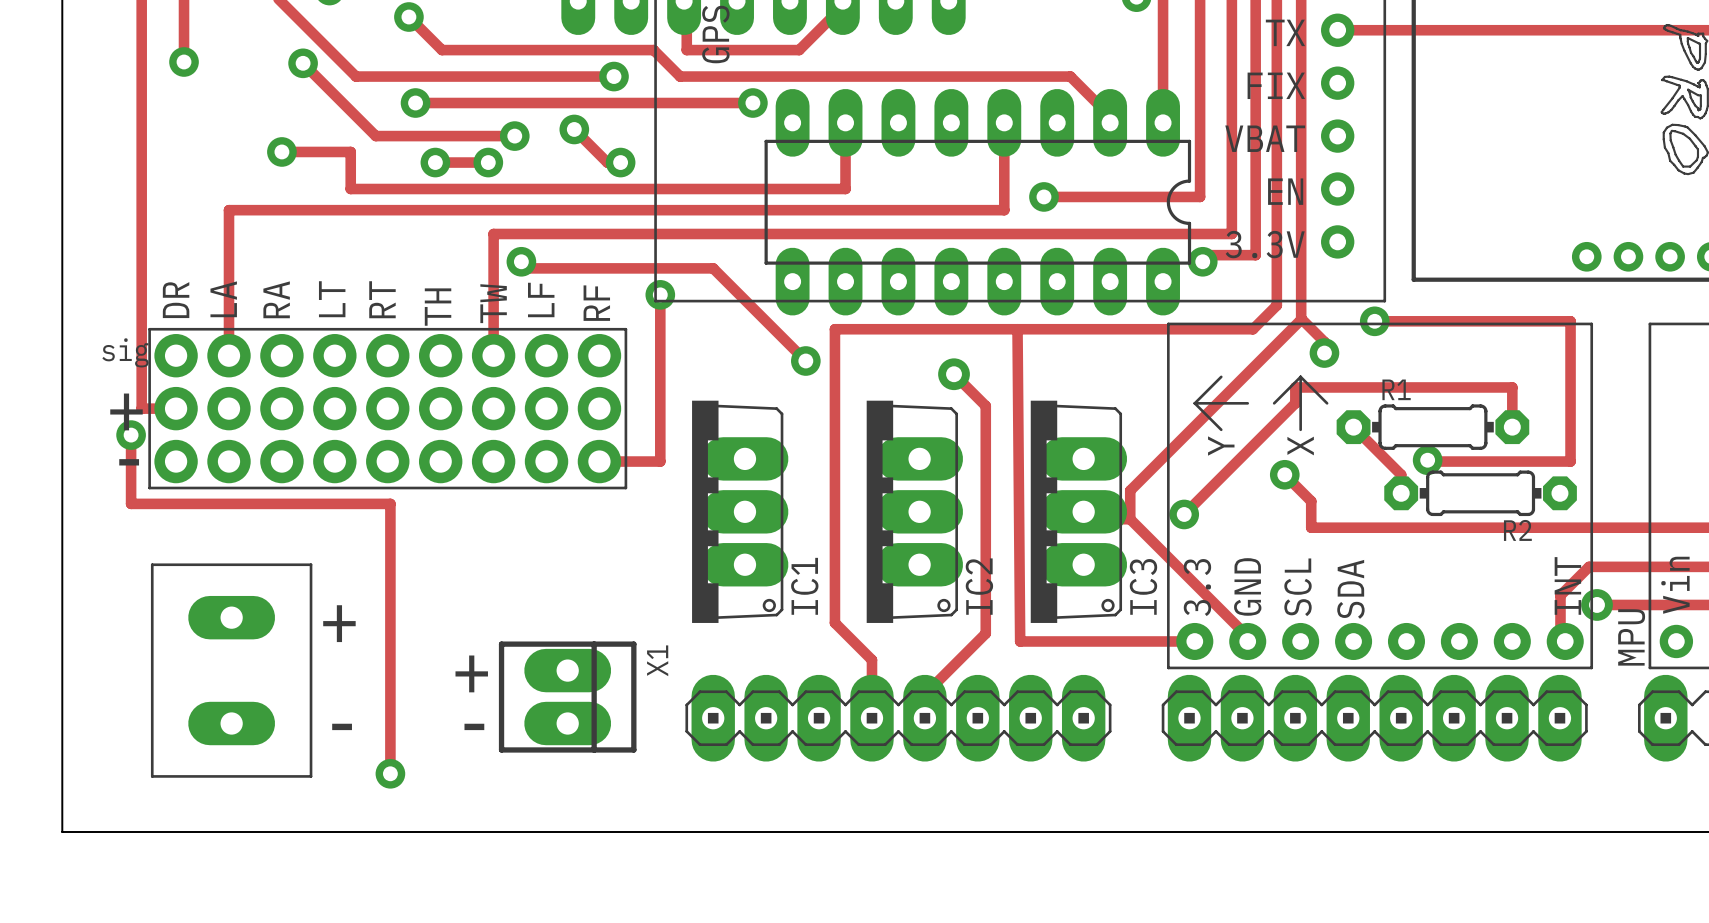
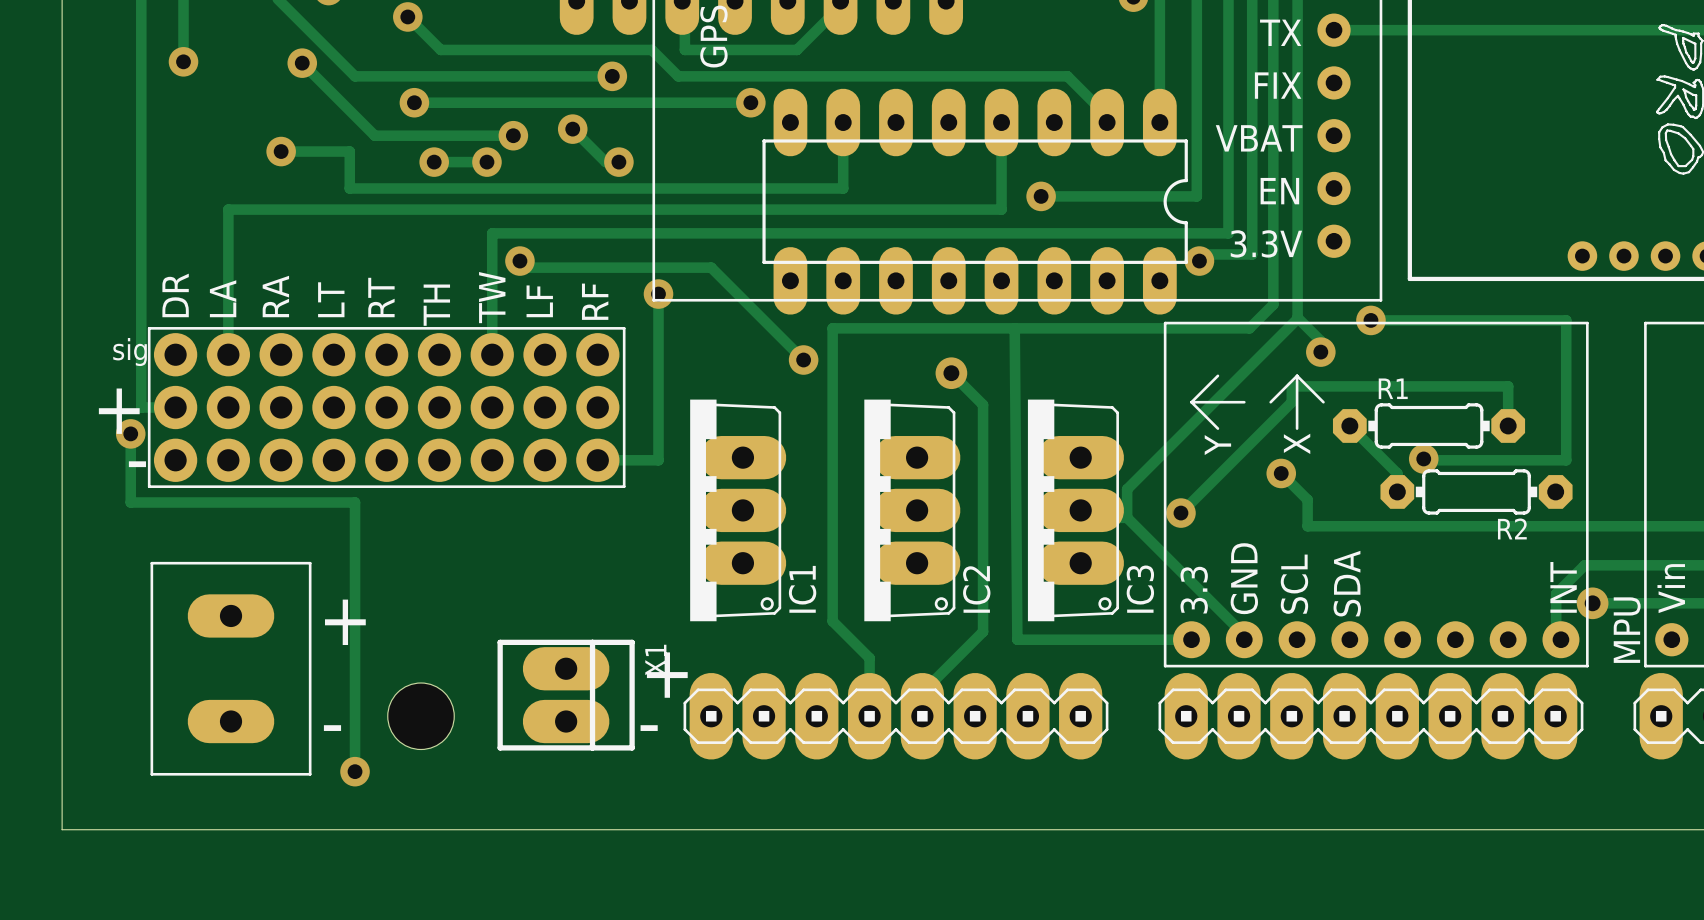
track: (356, 503) (390, 503) (390, 773) -> (355, 502) (355, 771)
text position: + (471, 673) -> + (667, 675)
hole: none -> (421, 716)
text position: - (474, 726) -> - (649, 728)
via position: (390, 773) -> (355, 771)

